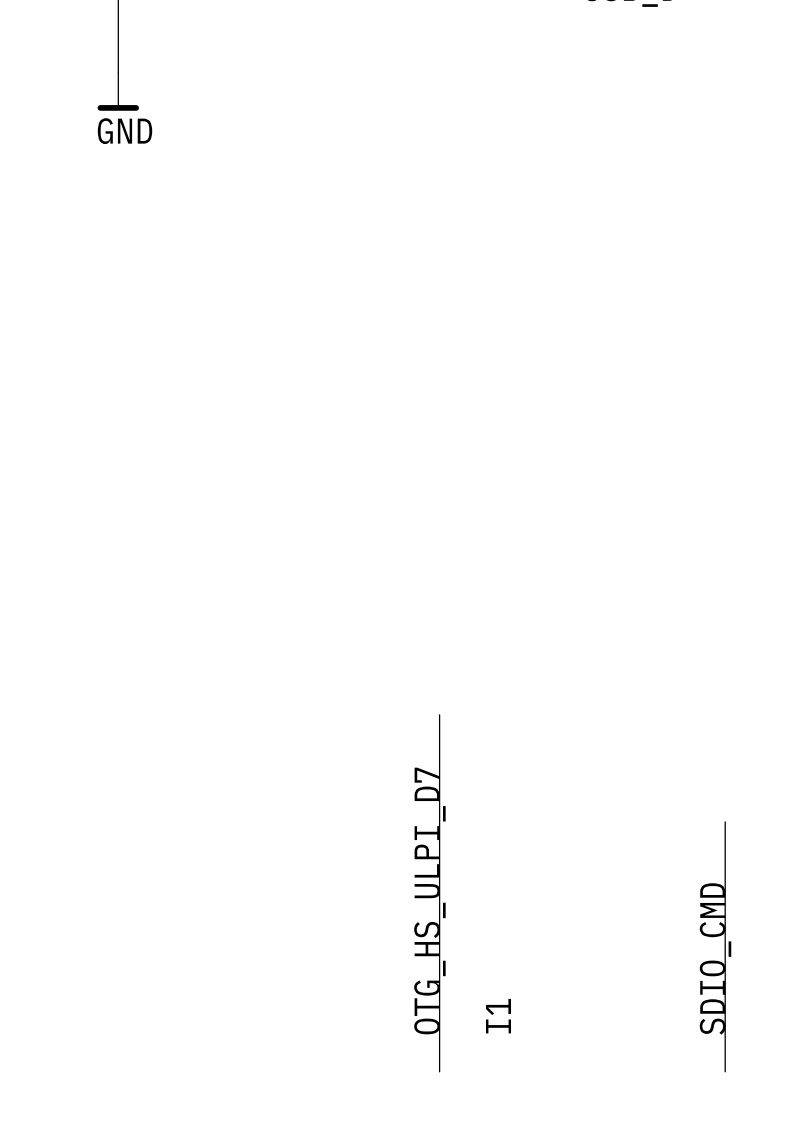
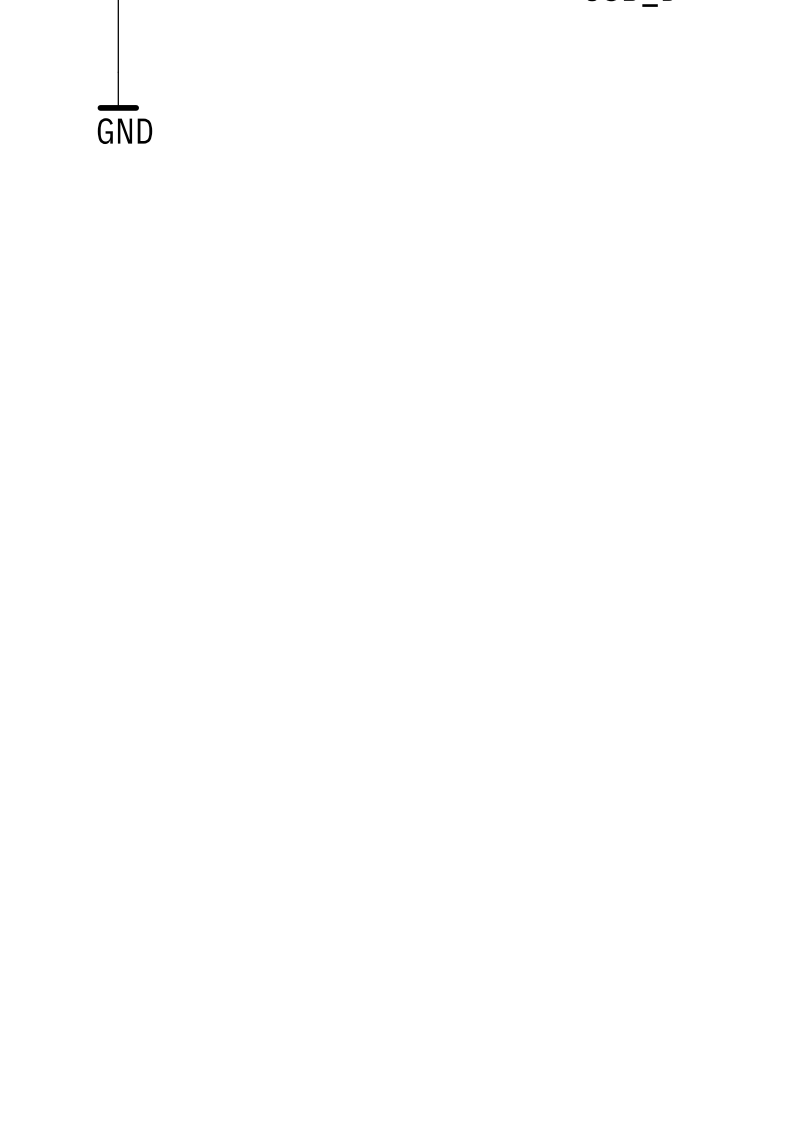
wire: (439, 714) (439, 1071) -> none
wire: (725, 821) (725, 1071) -> none
label: OTG_HS_ULPI_D7 (429, 900) -> none
label: SDIO_CMD (715, 958) -> none
label: I1 (498, 1016) -> none

